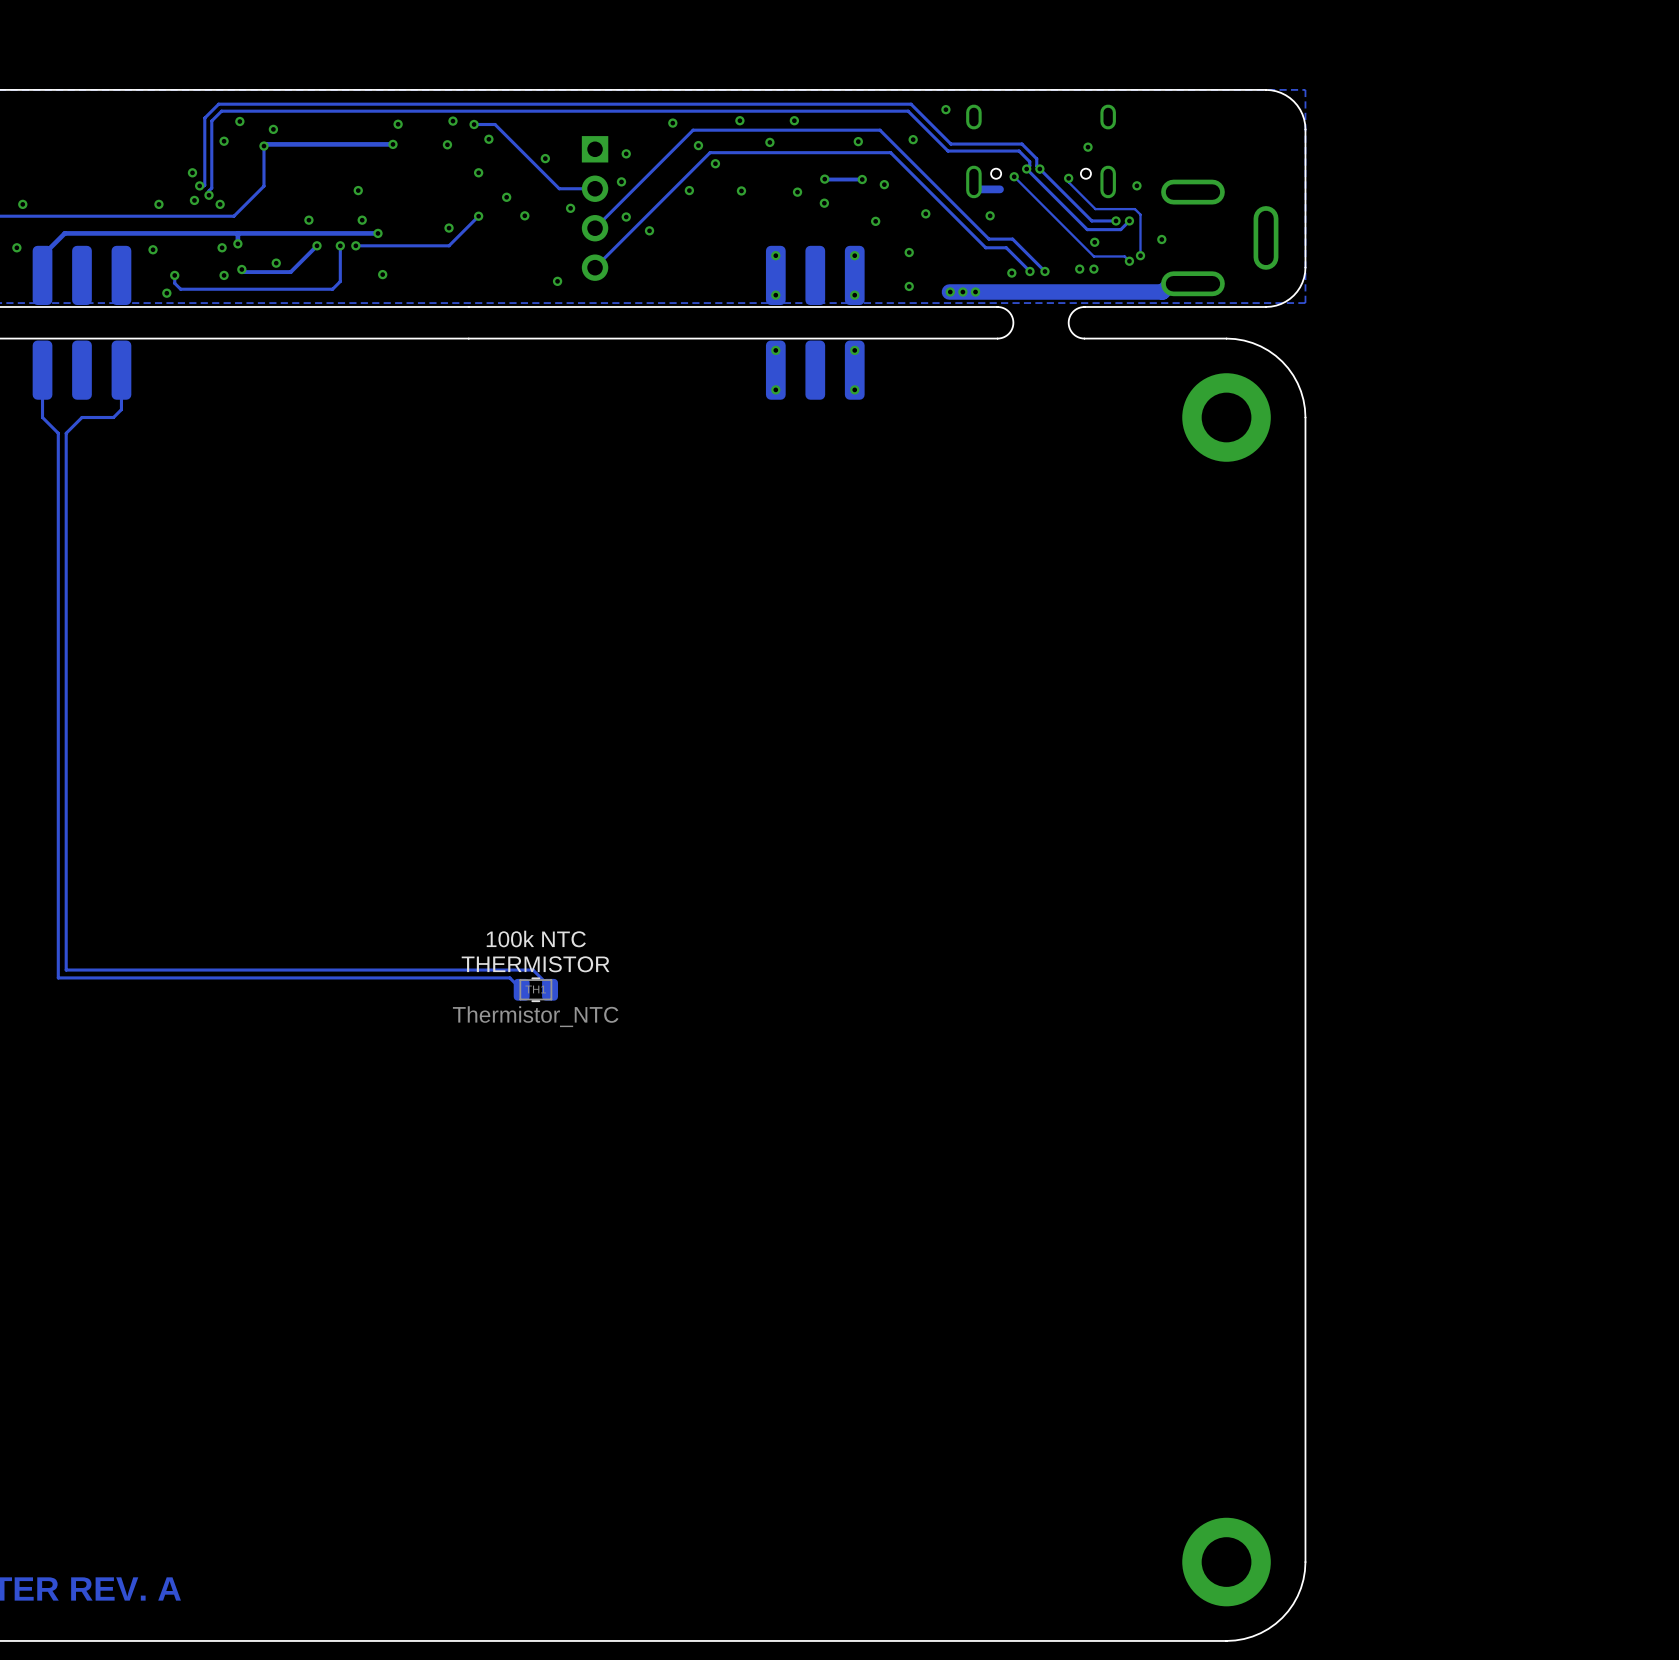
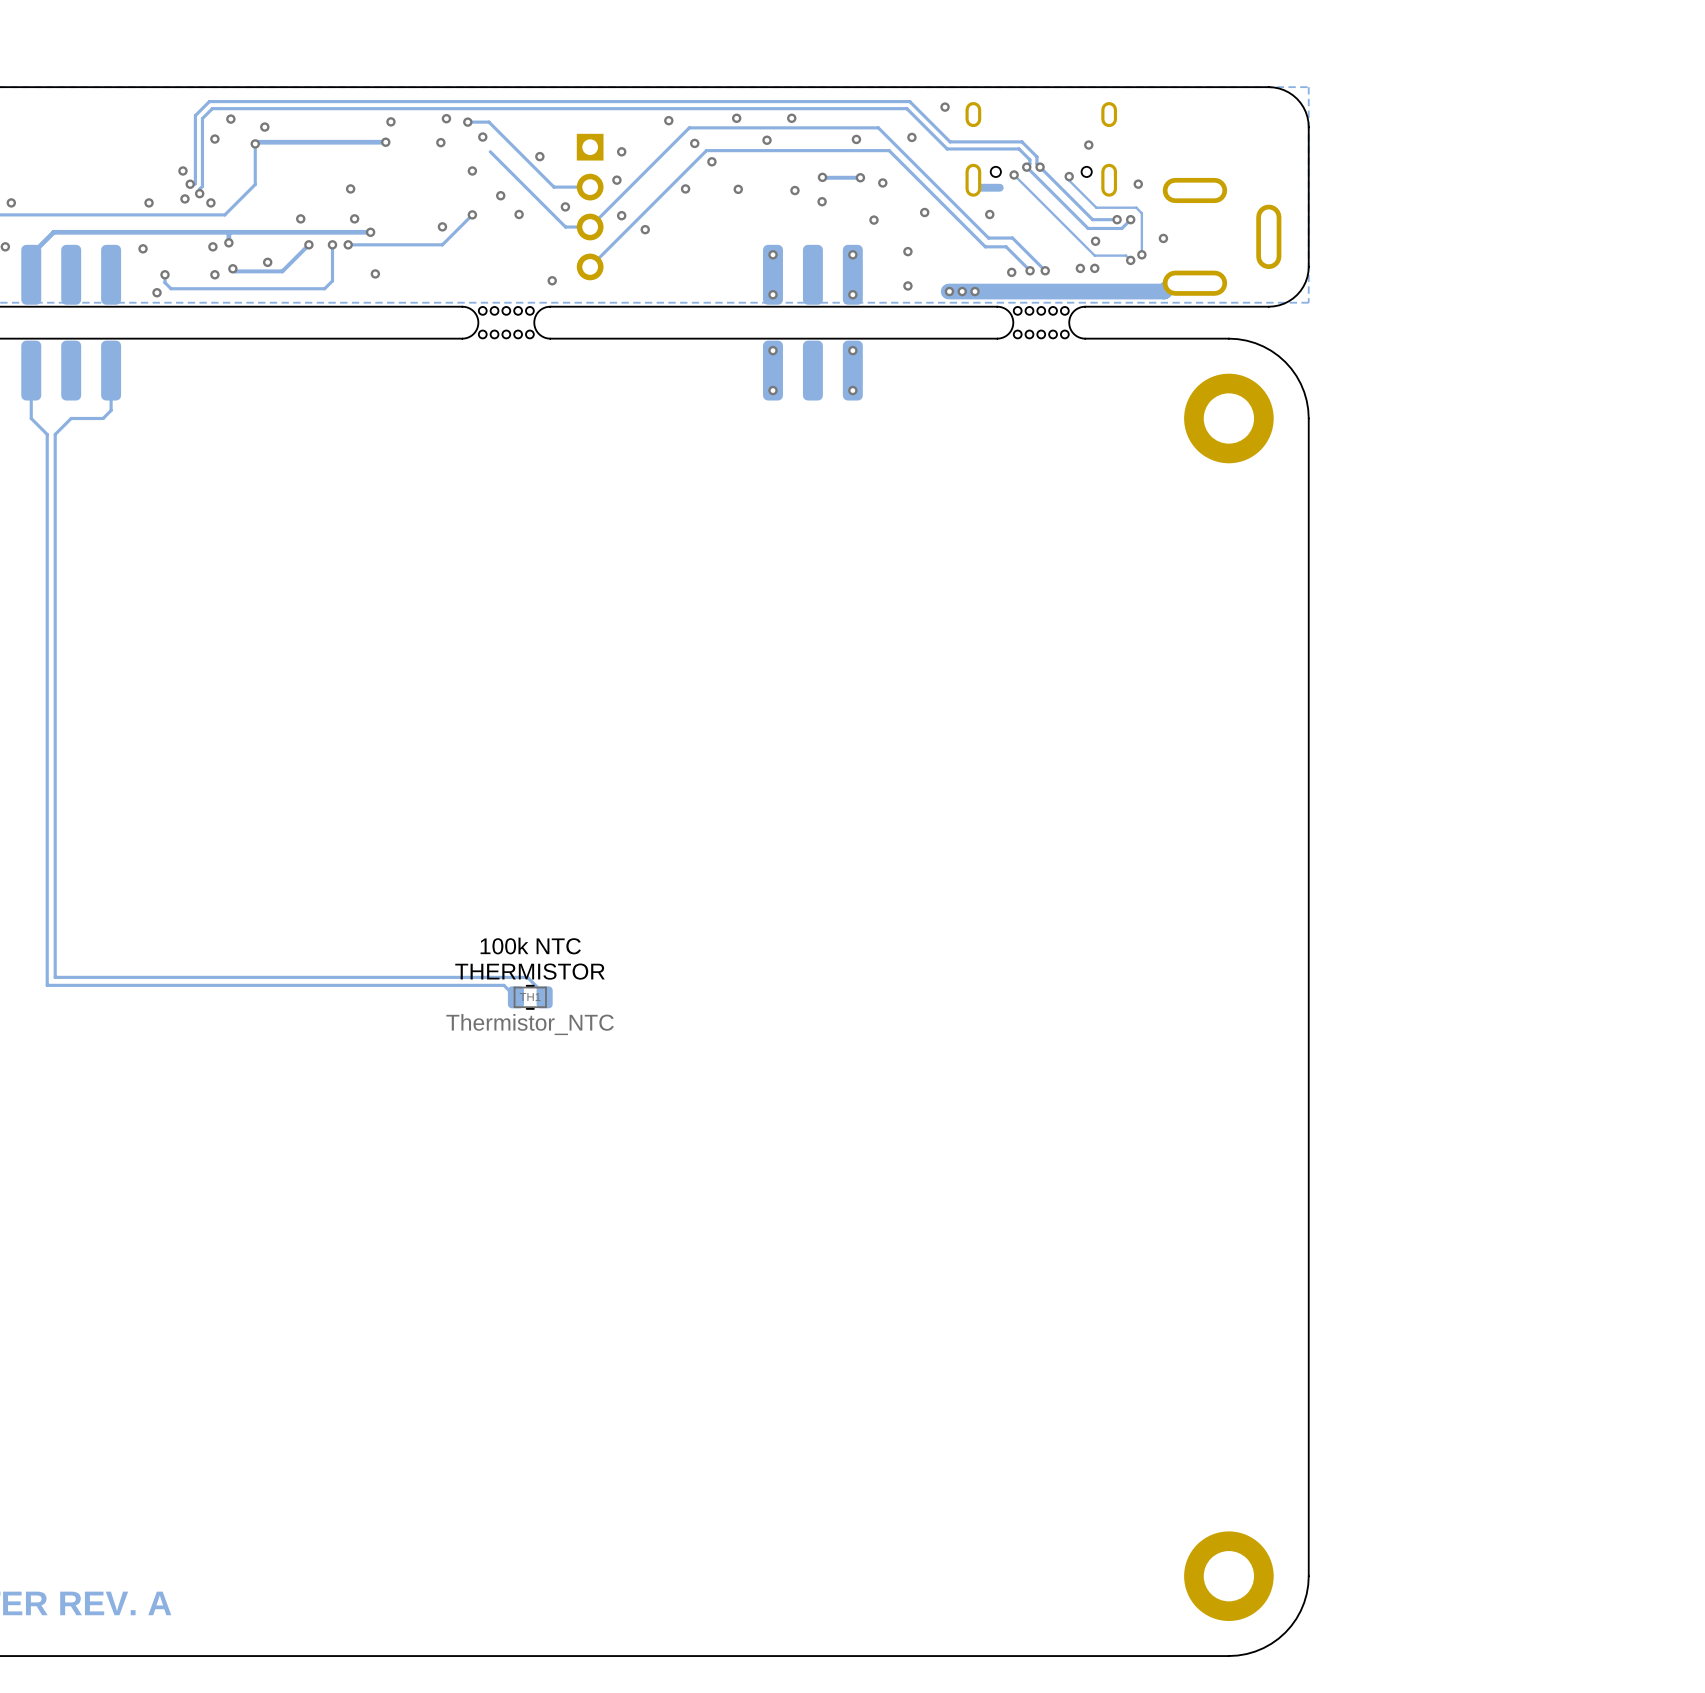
track: none -> (490, 151) (565, 227) (590, 227)
board edge: (555, 306) (468, 306) -> (550, 306) (538, 311) (534, 322) (538, 333) (550, 338)
part: none -> (506, 322)
part: none -> (1041, 322)
board edge: (555, 338) (468, 338) -> (462, 306) (473, 311) (478, 322) (473, 333) (462, 338)

